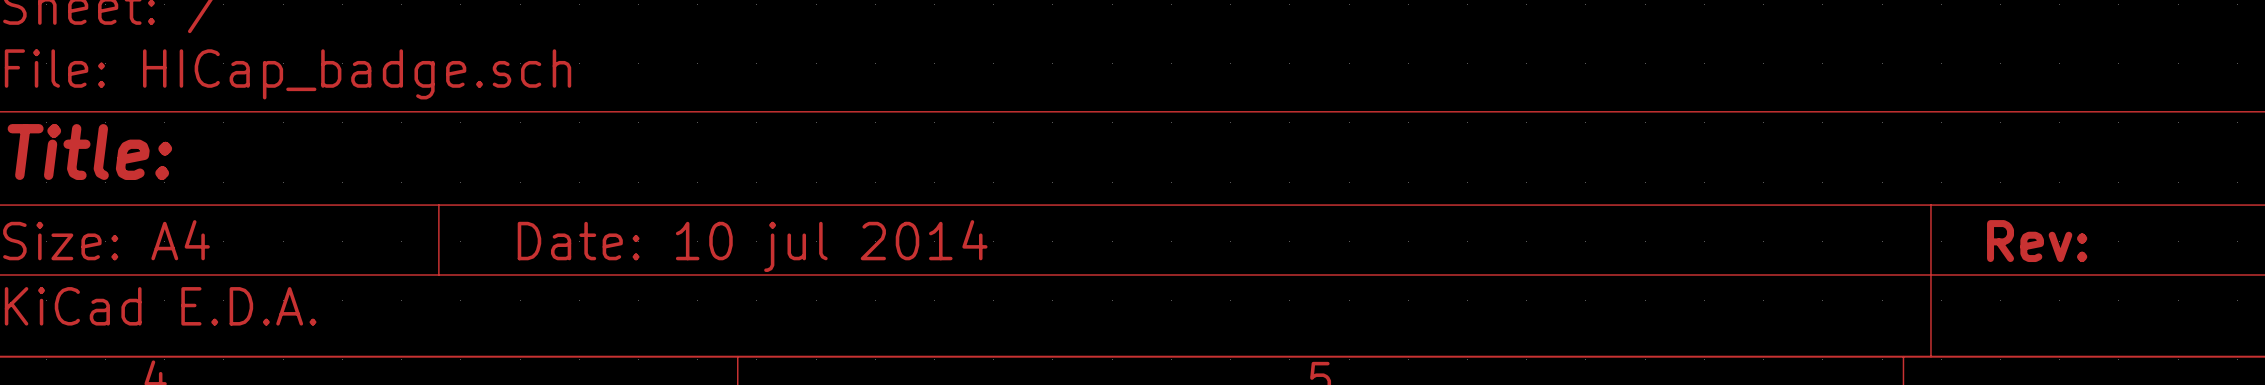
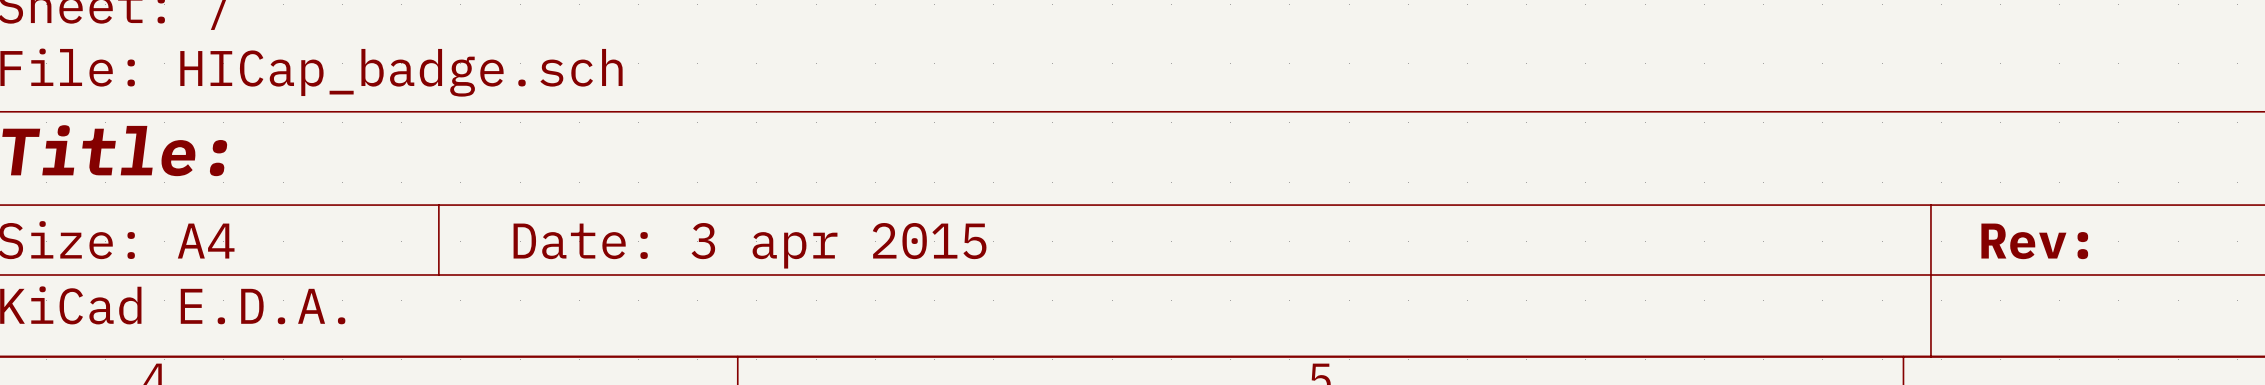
title block: Date: 10 jul 2014 (752, 246) -> Date: 3 apr 2015 (750, 245)

